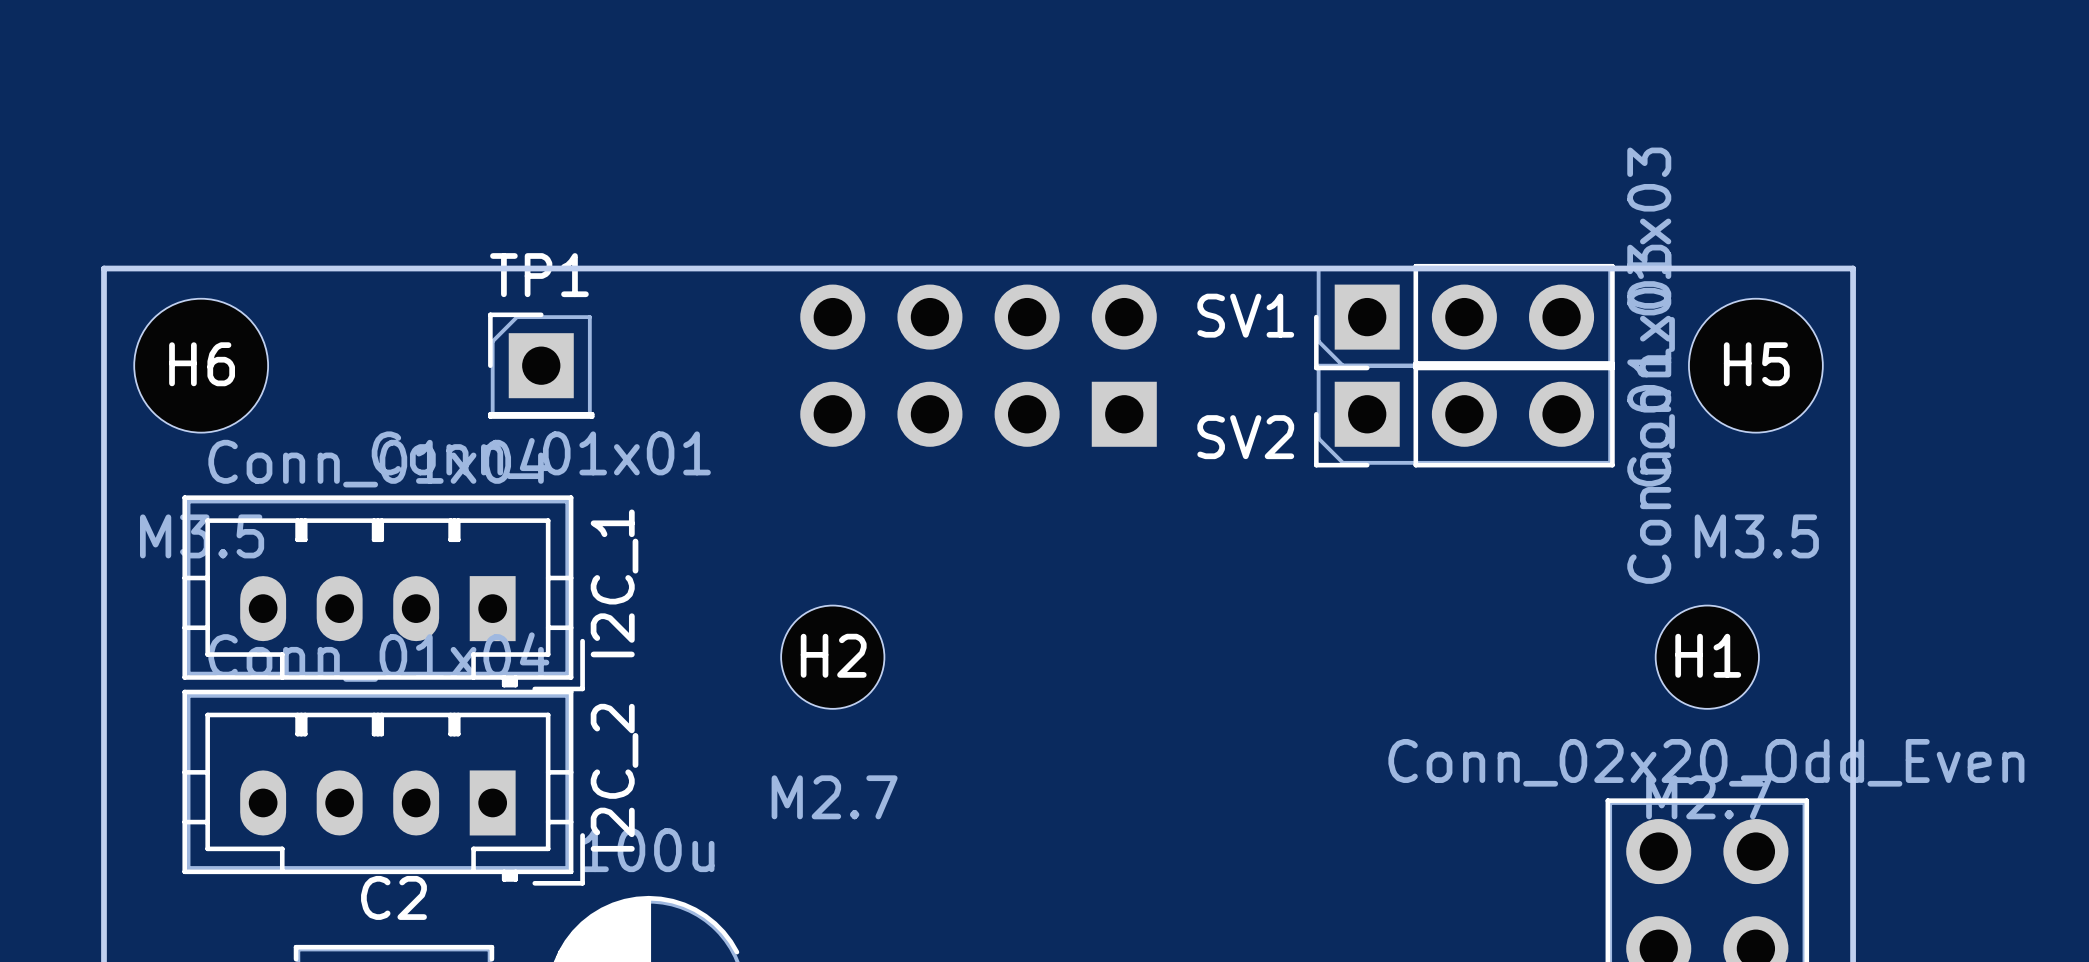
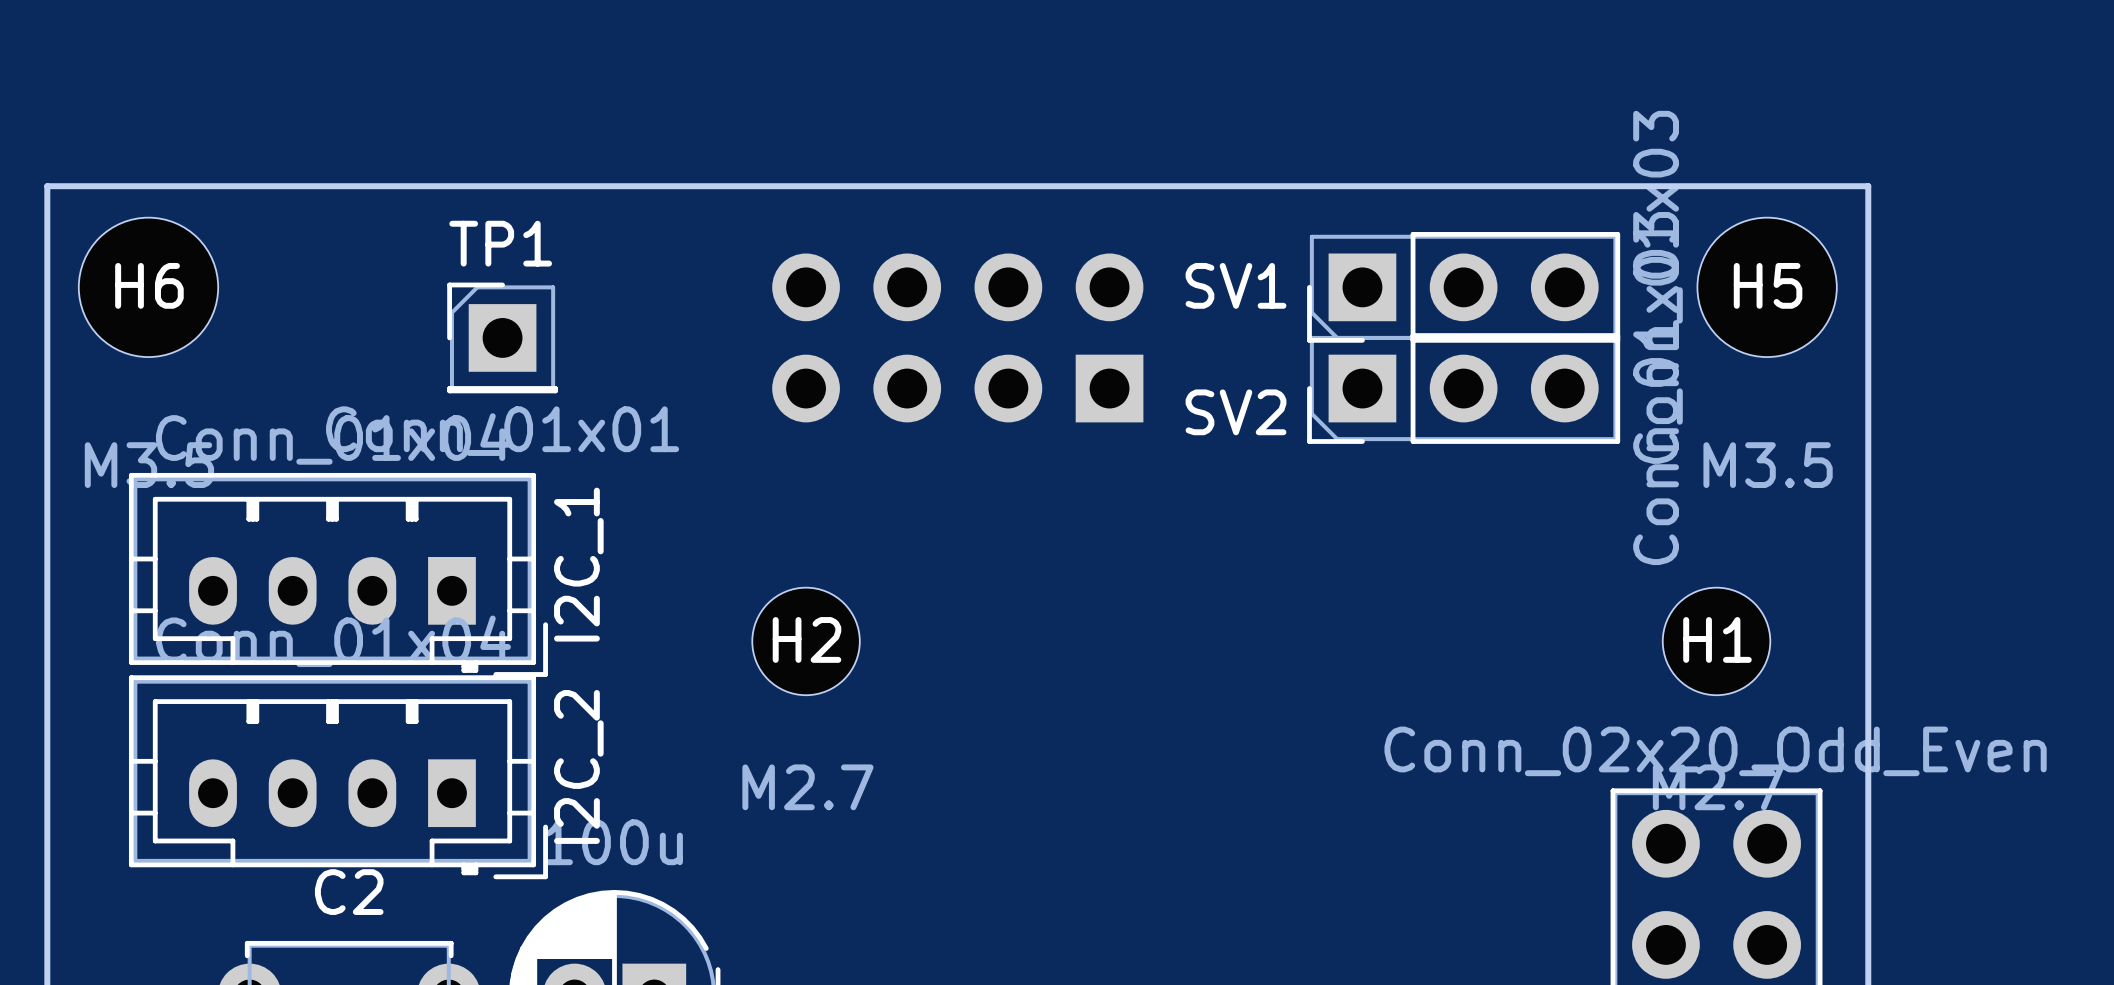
board edge: (103, 268) (1853, 268) -> (47, 236) (47, 186) (1868, 186) (1868, 236)
H6 position: (201, 365) -> (148, 287)
H5 position: (1755, 365) -> (1767, 287)

